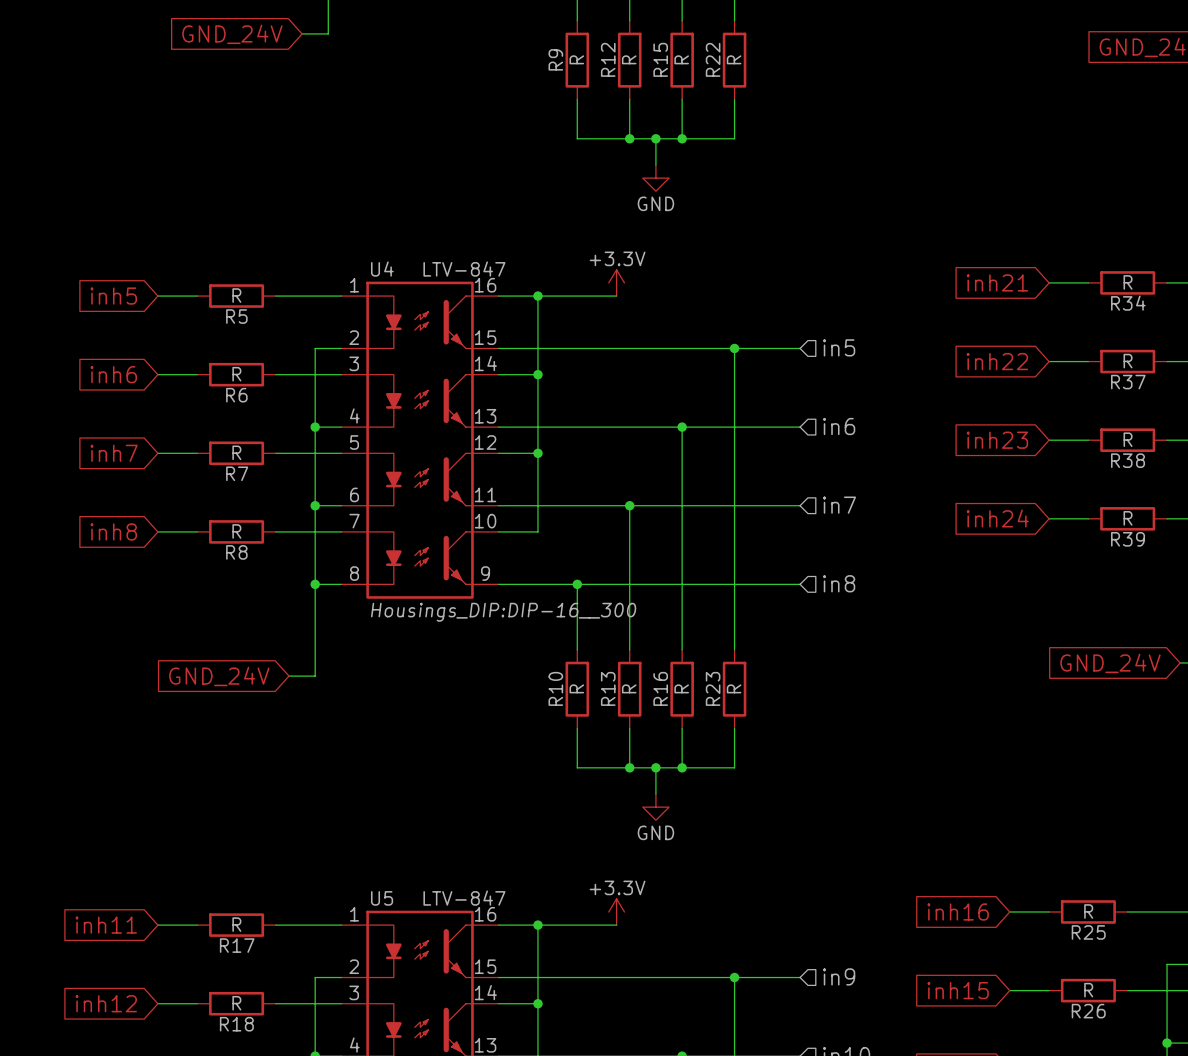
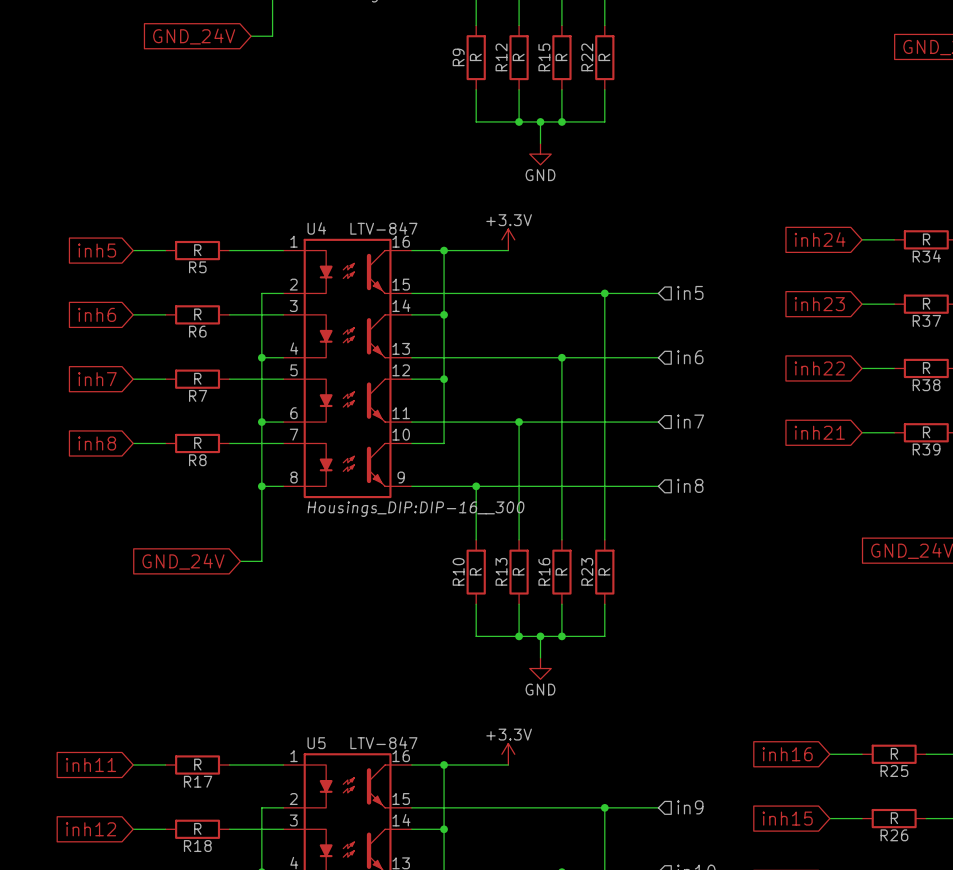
global label: inh21 (997, 282) -> inh24 (820, 239)
global label: inh22 (997, 361) -> inh23 (819, 304)
global label: inh23 (997, 440) -> inh22 (819, 368)
global label: inh24 (997, 518) -> inh21 (819, 432)

